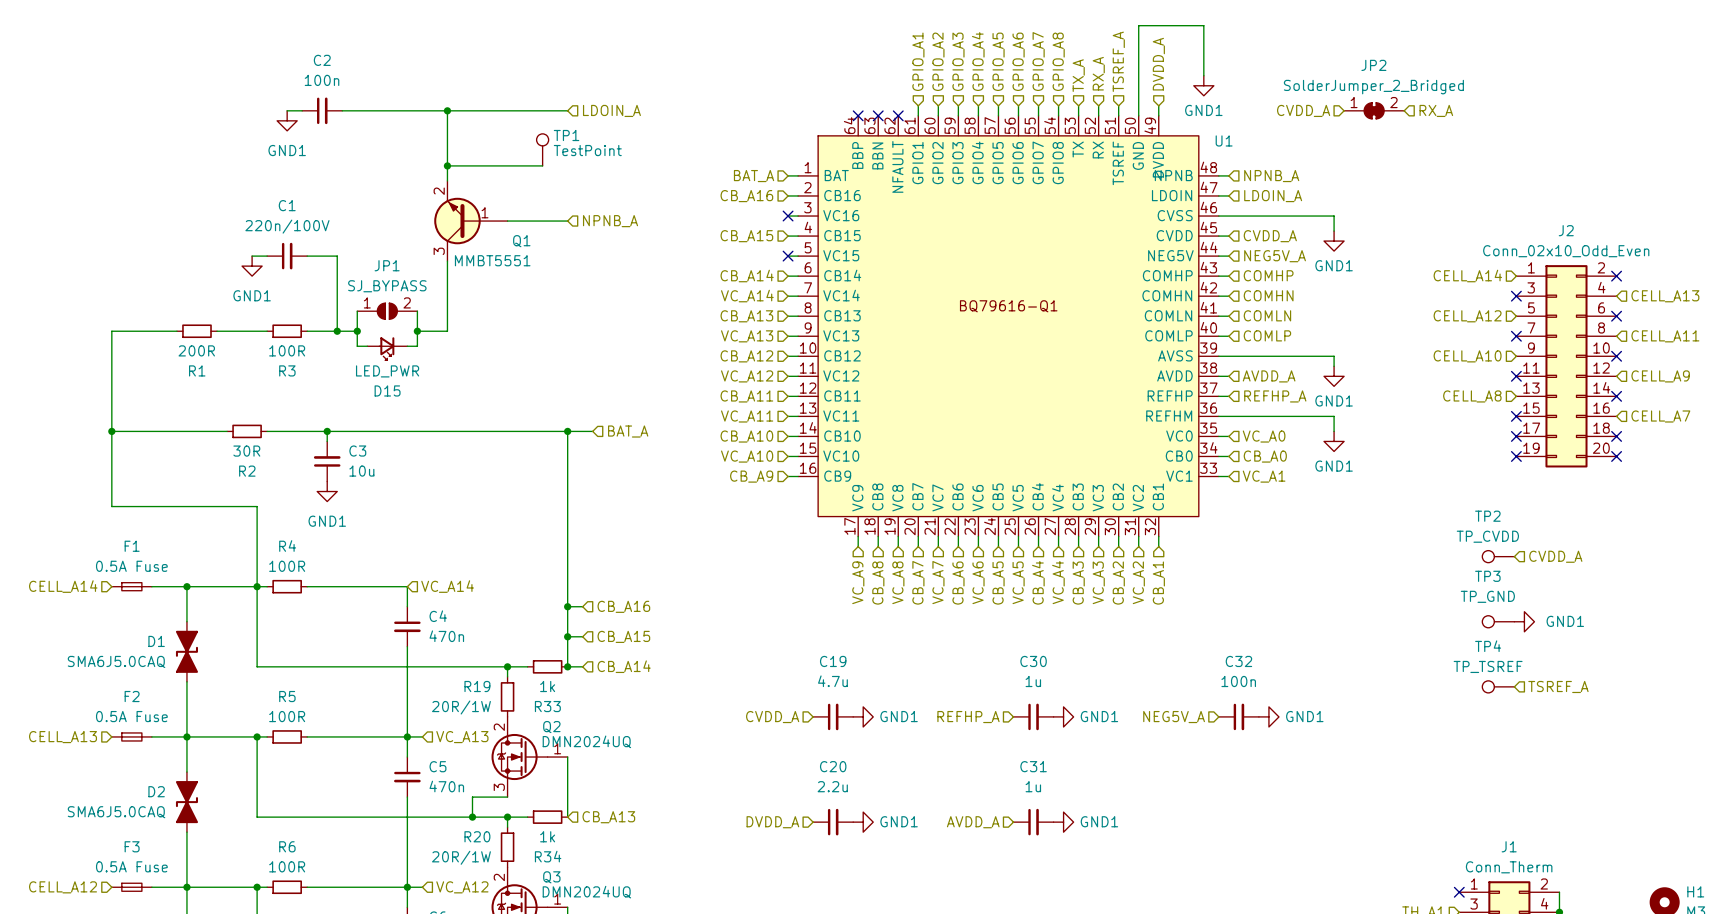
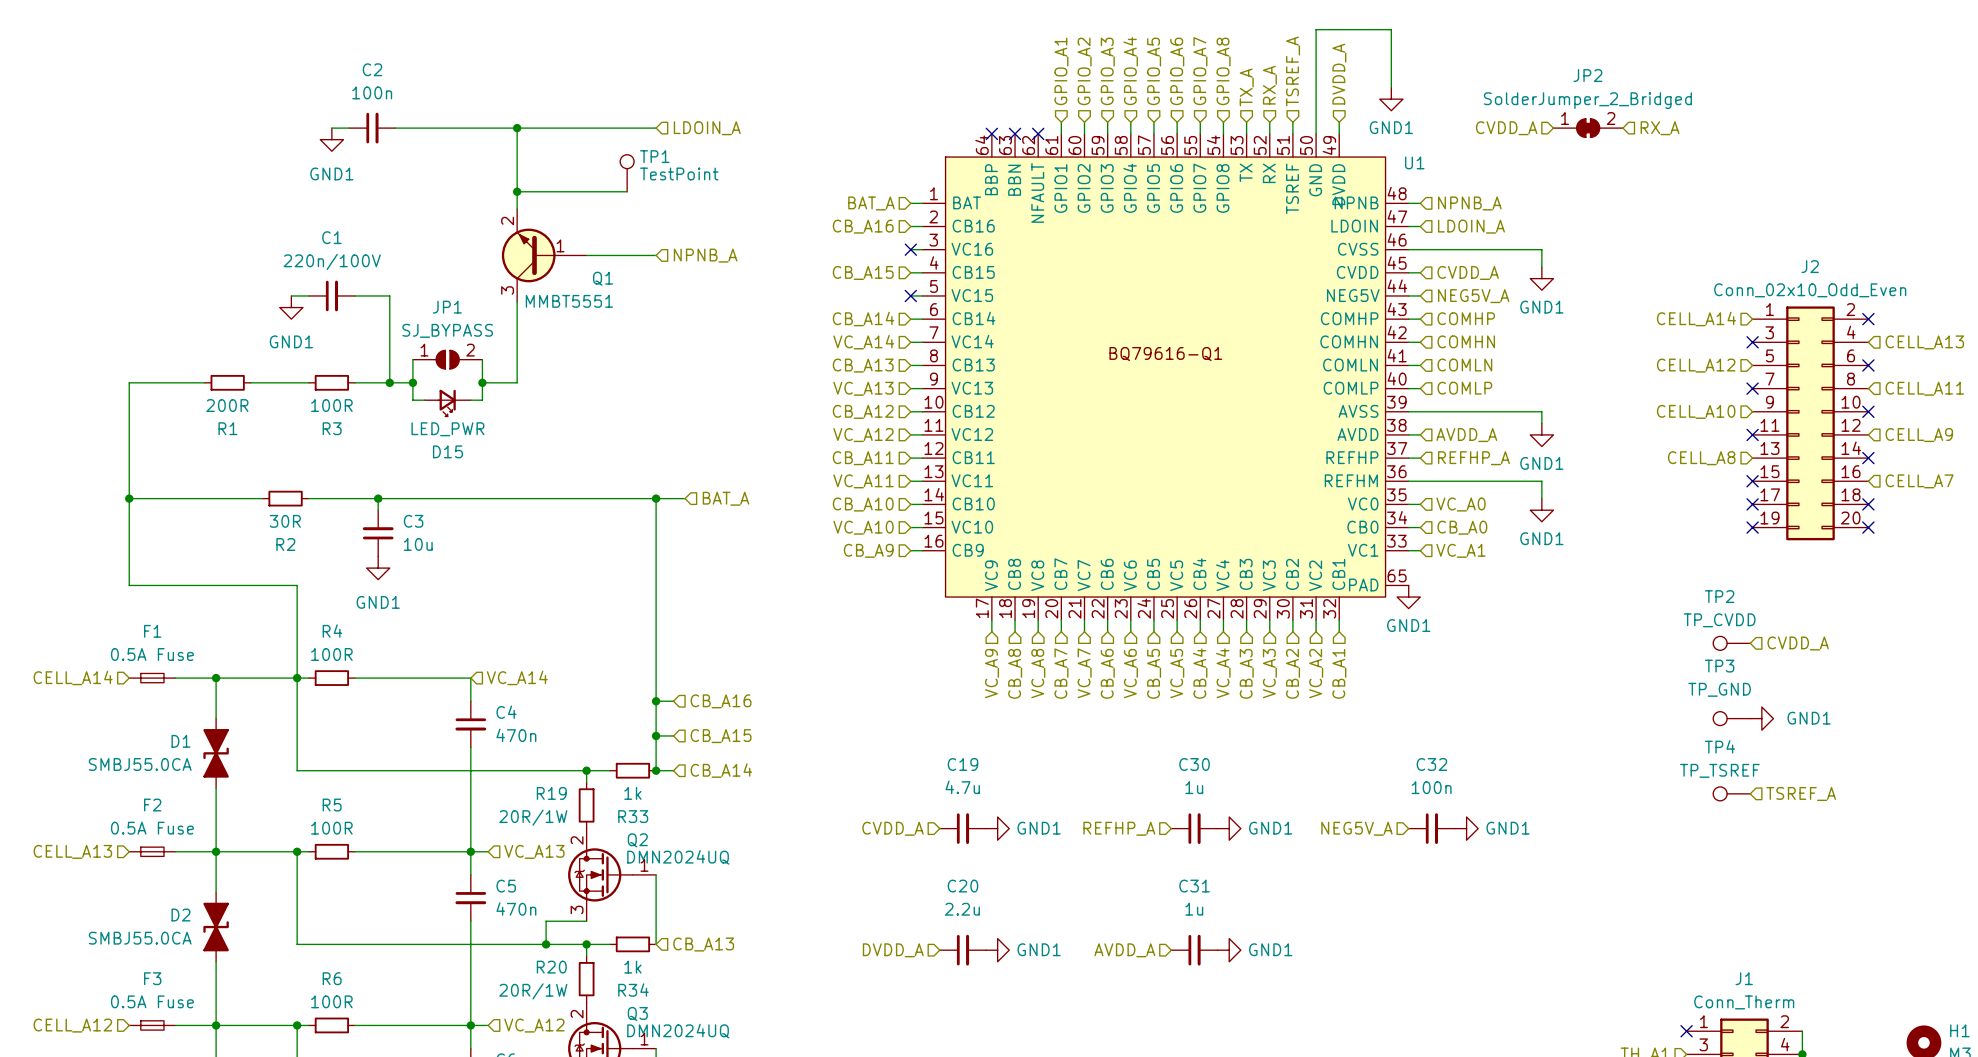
U1 symbol: [798, 115, 1219, 537] -> [922, 133, 1409, 621]
power symbol: none -> GND1 (1408, 597)
D1 value: SMA6J5.0CAQ (116, 661) -> SMBJ55.0CA (140, 764)
D2 value: SMA6J5.0CAQ (116, 812) -> SMBJ55.0CA (140, 938)

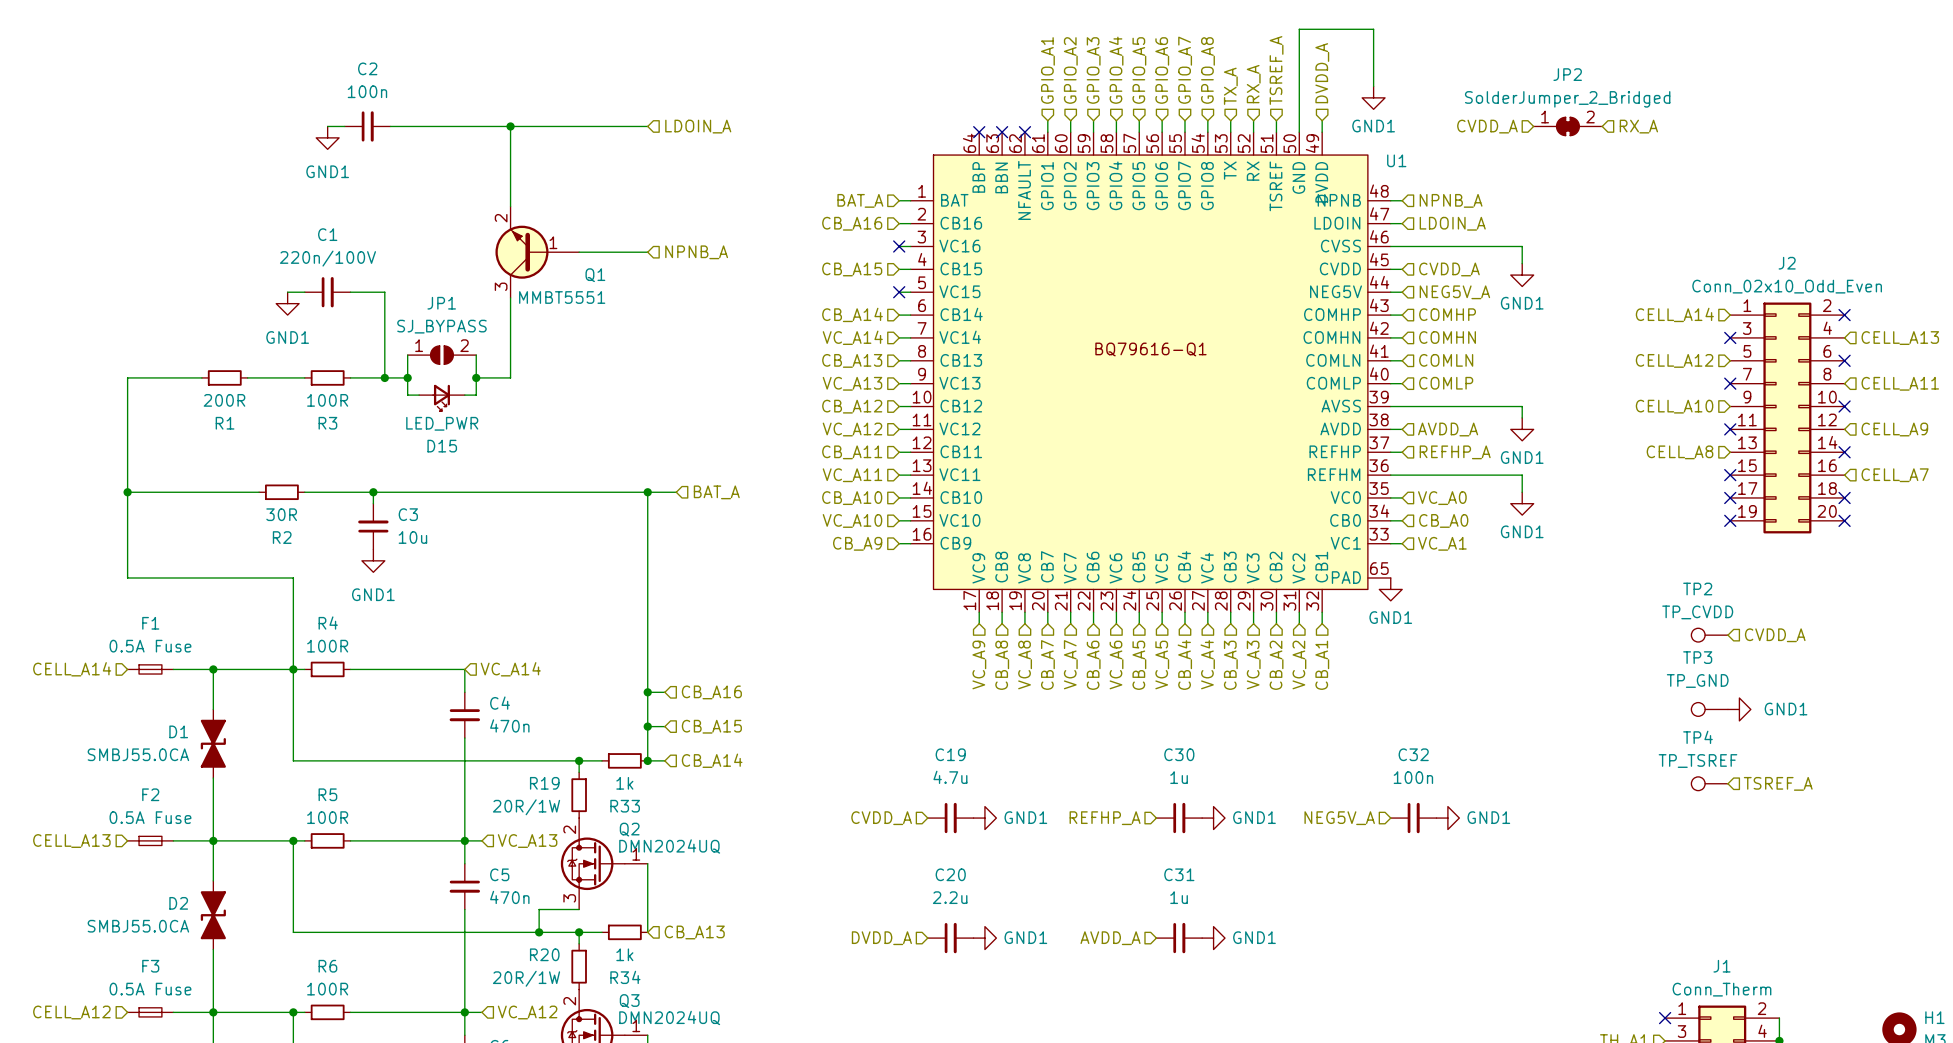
TP1: TestPoint (627, 173) -> none
wire: (517, 191) (627, 191) -> none
junction: (517, 191) -> none

